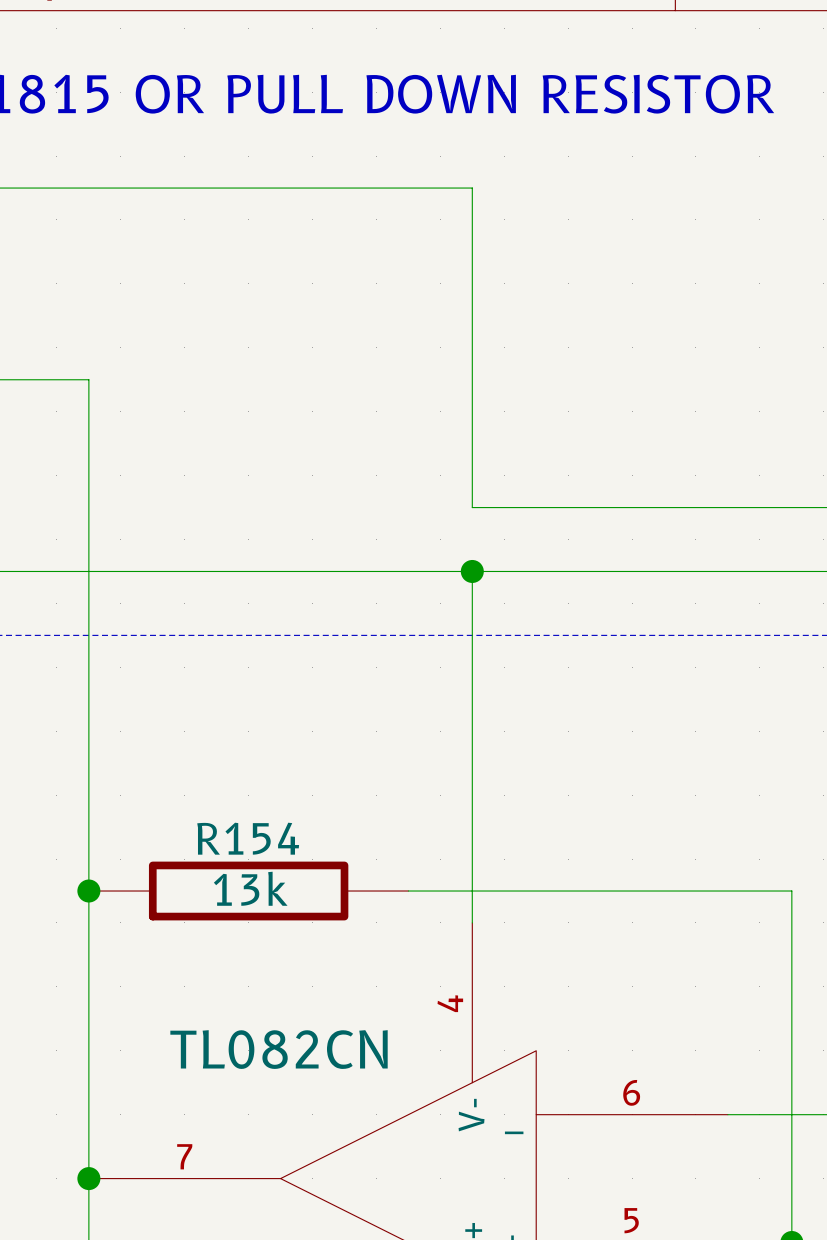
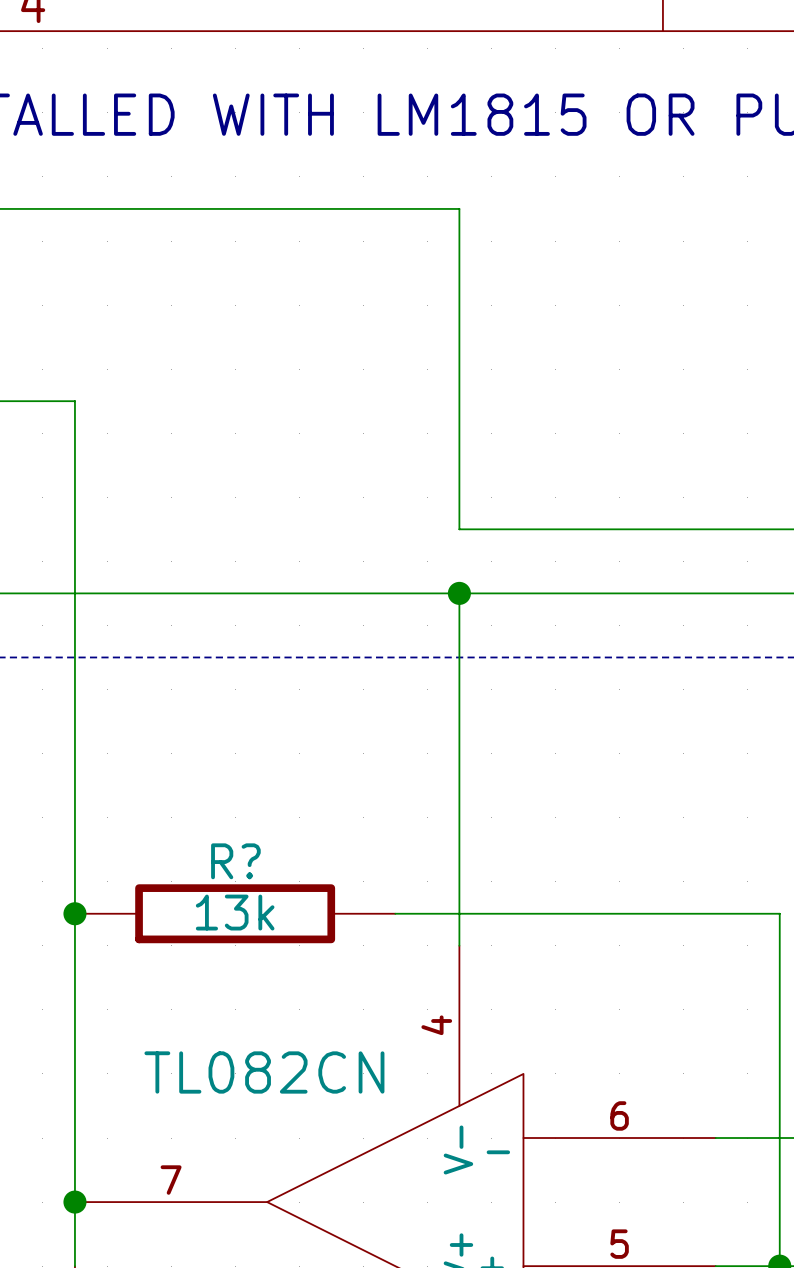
R154 name: R154 (248, 838) -> R? (235, 861)

